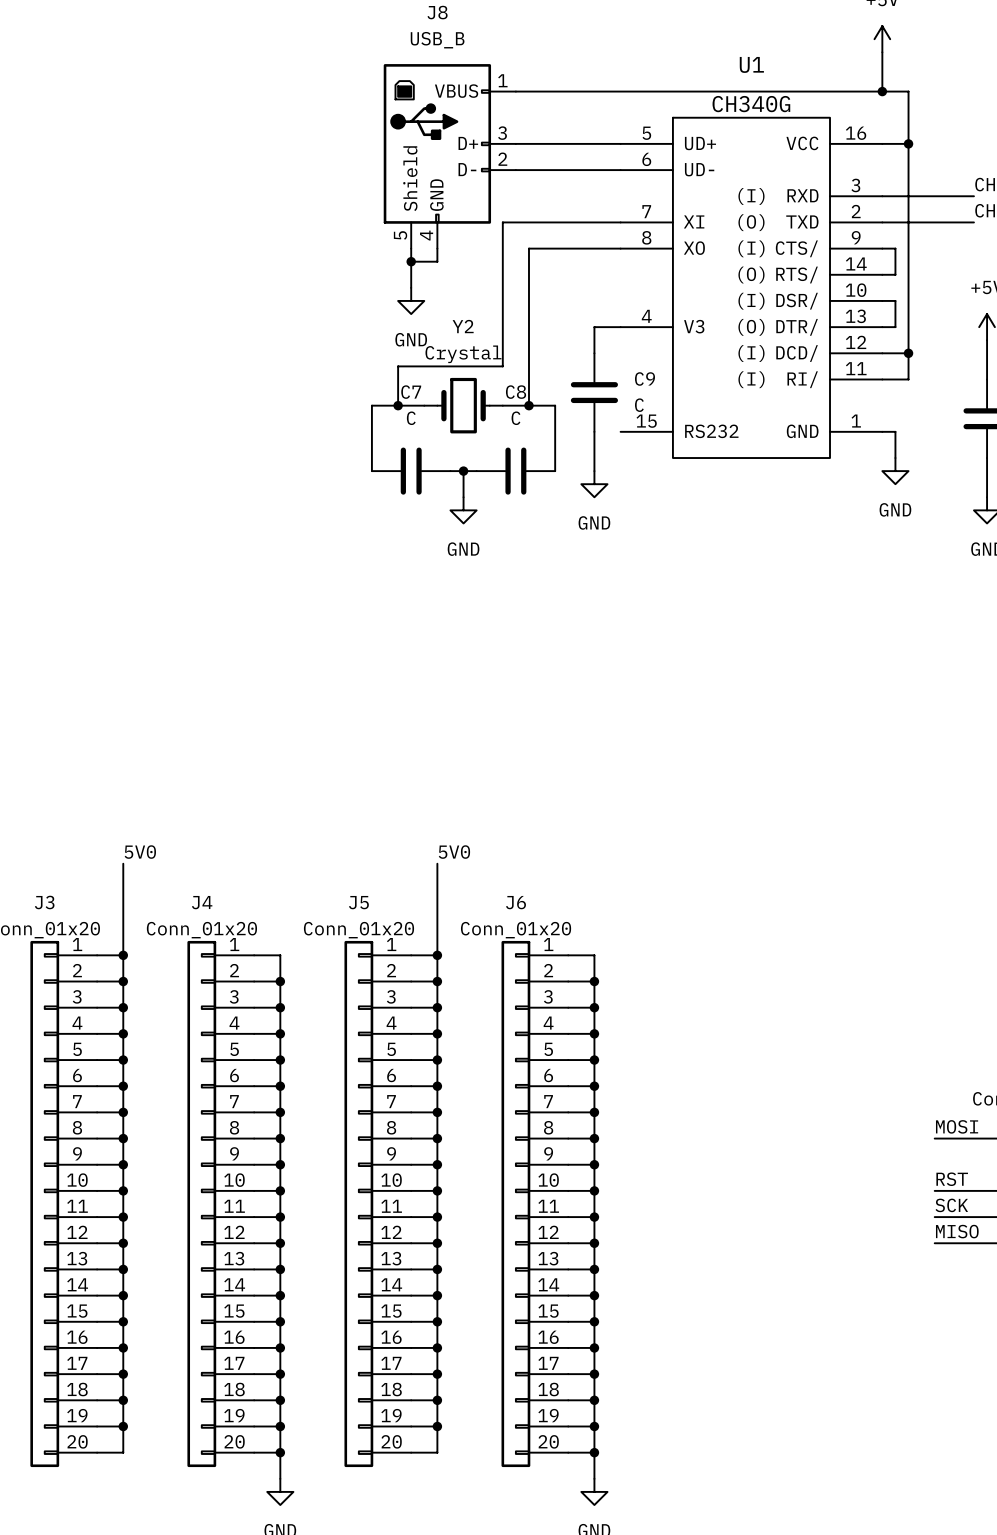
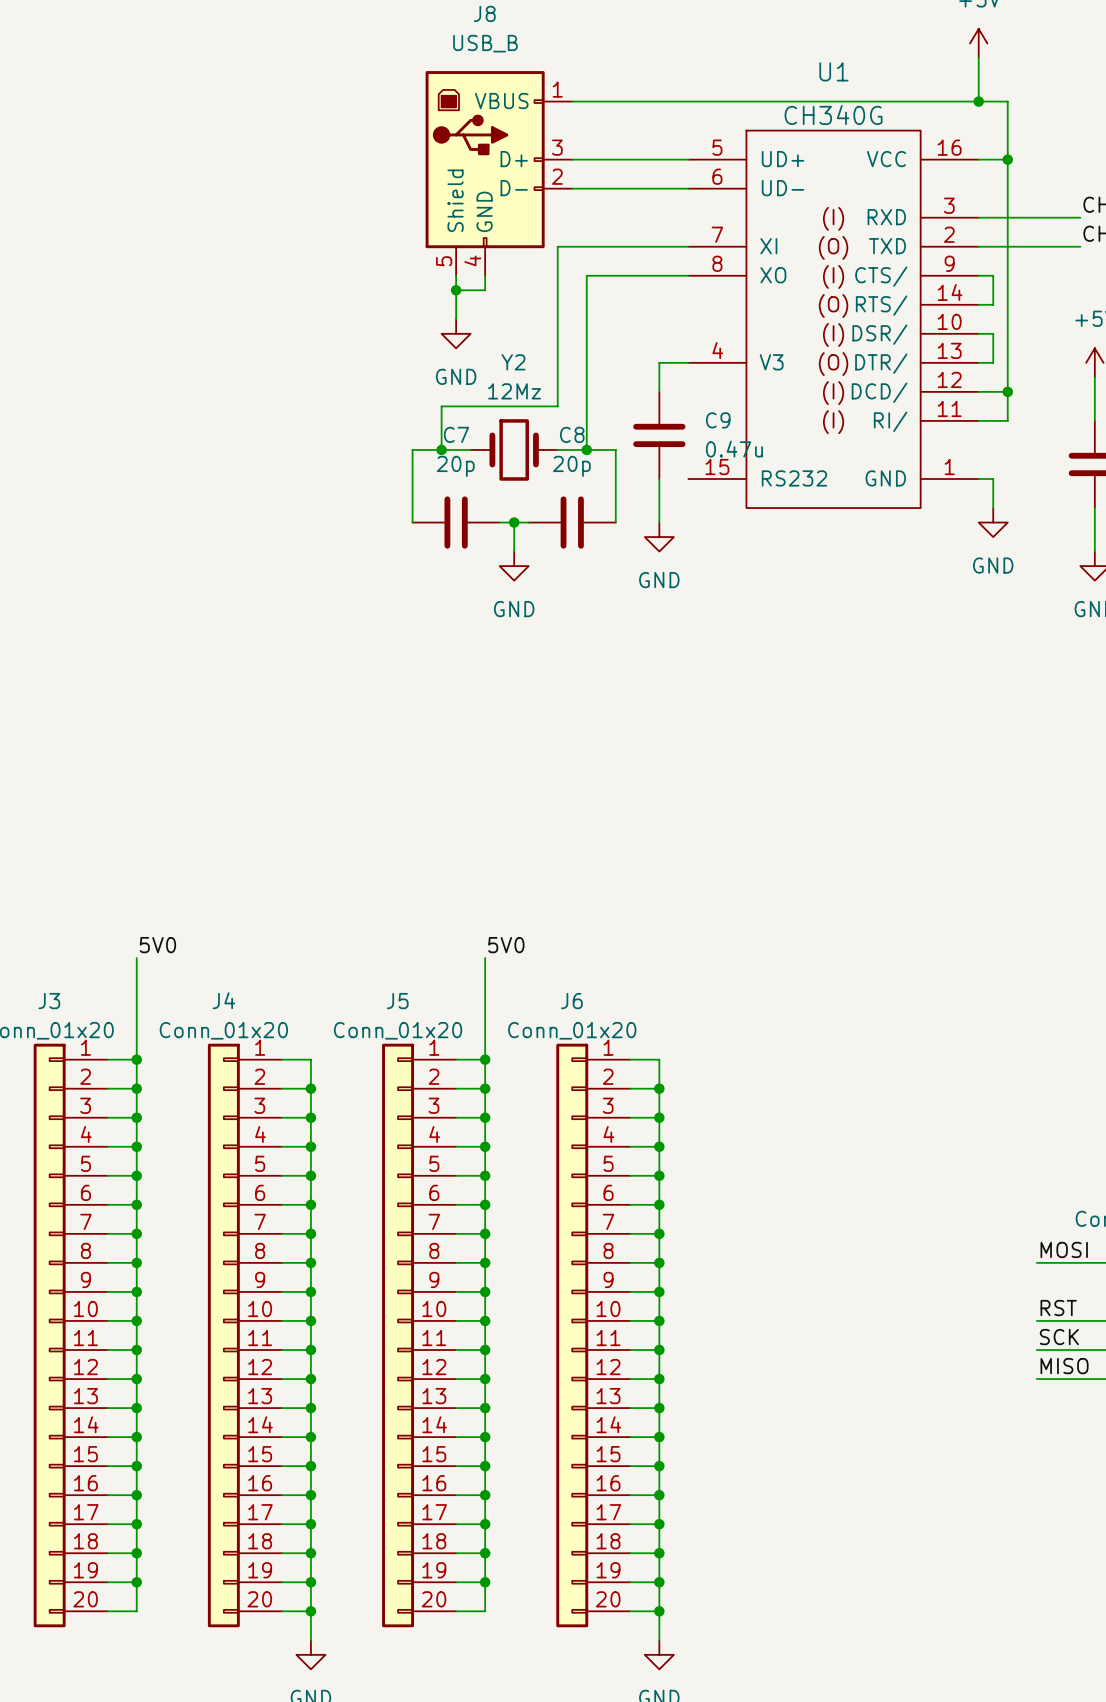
Y2 value: Crystal (463, 354) -> 12Mz (514, 391)
C9 value: C (639, 405) -> 0.47u (734, 449)
C7 value: C (411, 418) -> 20p (455, 466)
C8 value: C (515, 418) -> 20p (571, 466)

